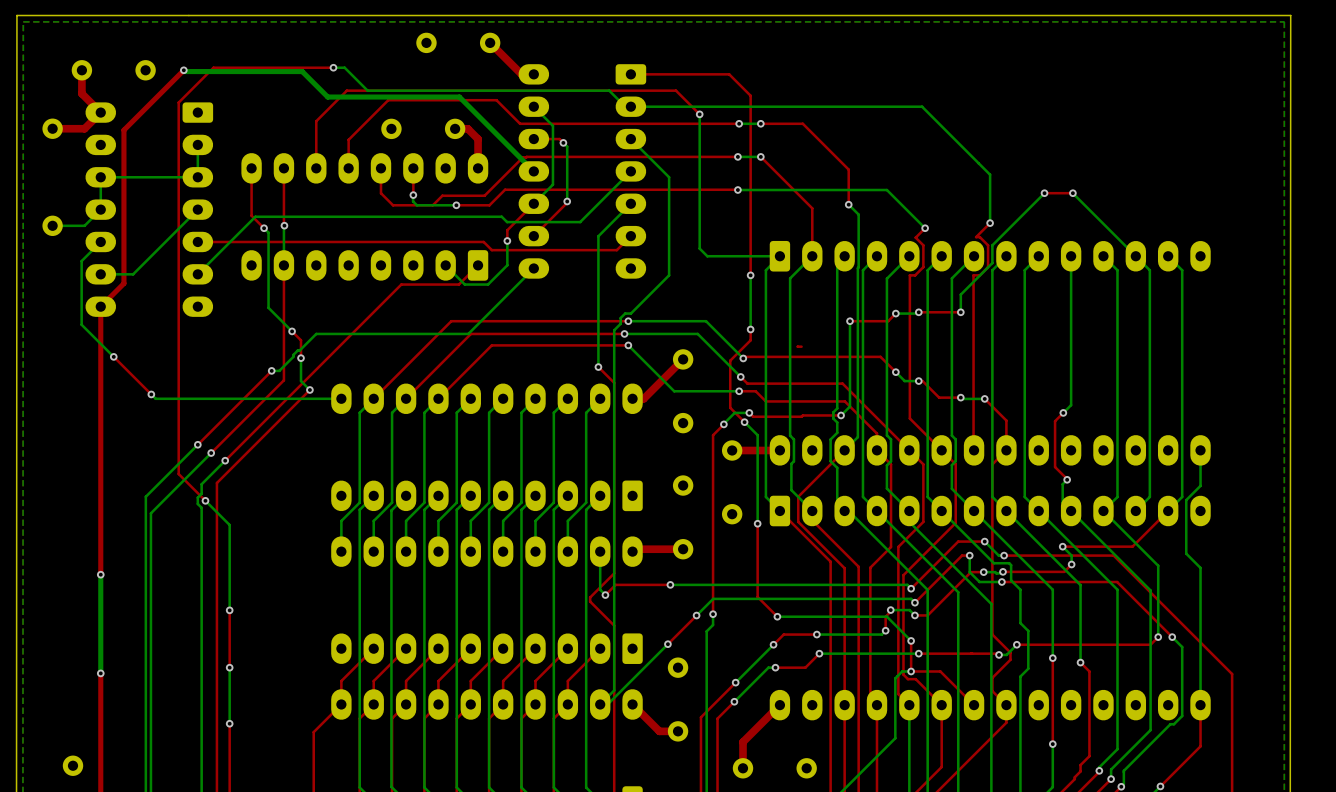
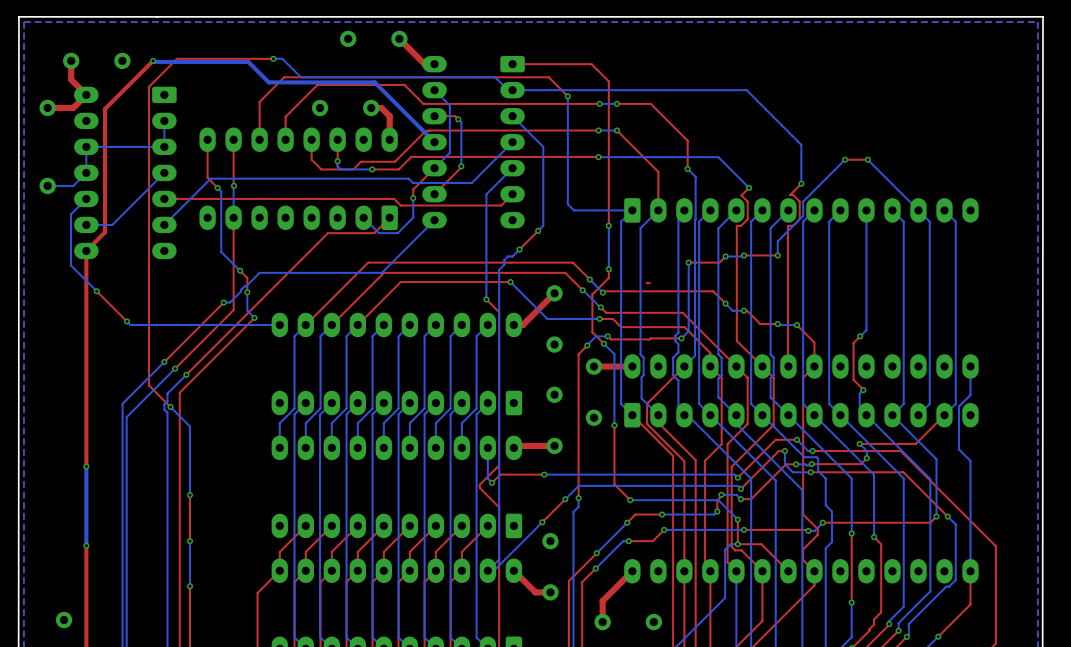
top track: none -> (538, 230) (519, 249)
bottom track: (662, 281) (639, 304) -> none
via: none -> (538, 230)
via: none -> (519, 249)
top track: none -> (510, 262) (572, 262) (589, 279)
bottom track: (628, 321) (706, 321) (727, 342) -> none
via: (628, 321) -> none
top track: none -> (507, 272) (565, 272) (582, 290)
bottom track: (624, 333) (697, 333) (740, 376) -> (582, 290) (600, 307)
via: (624, 333) -> none
via: none -> (589, 279)
via: none -> (582, 290)

